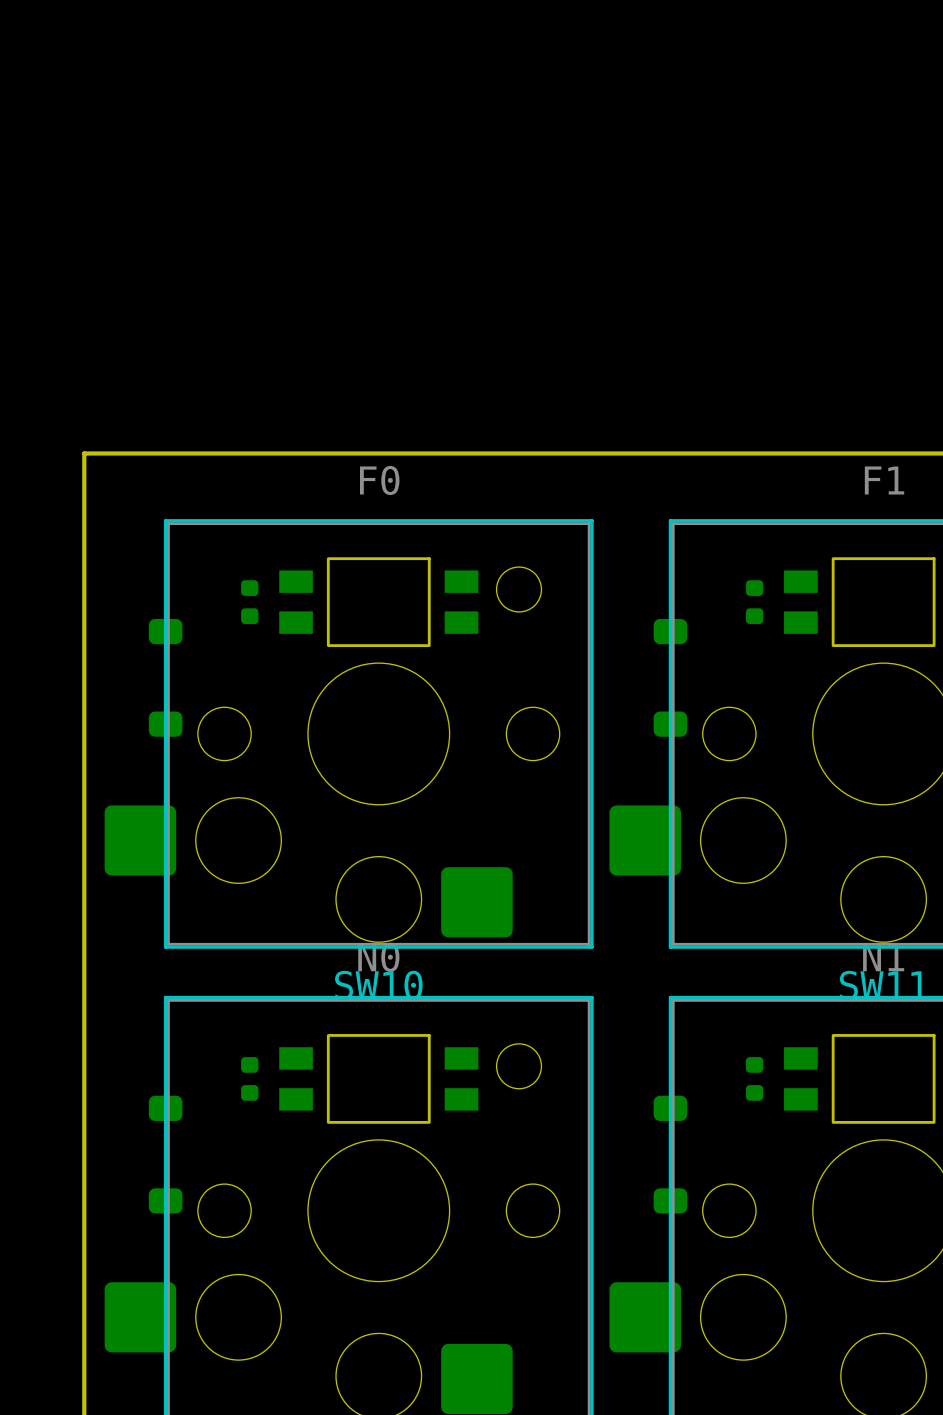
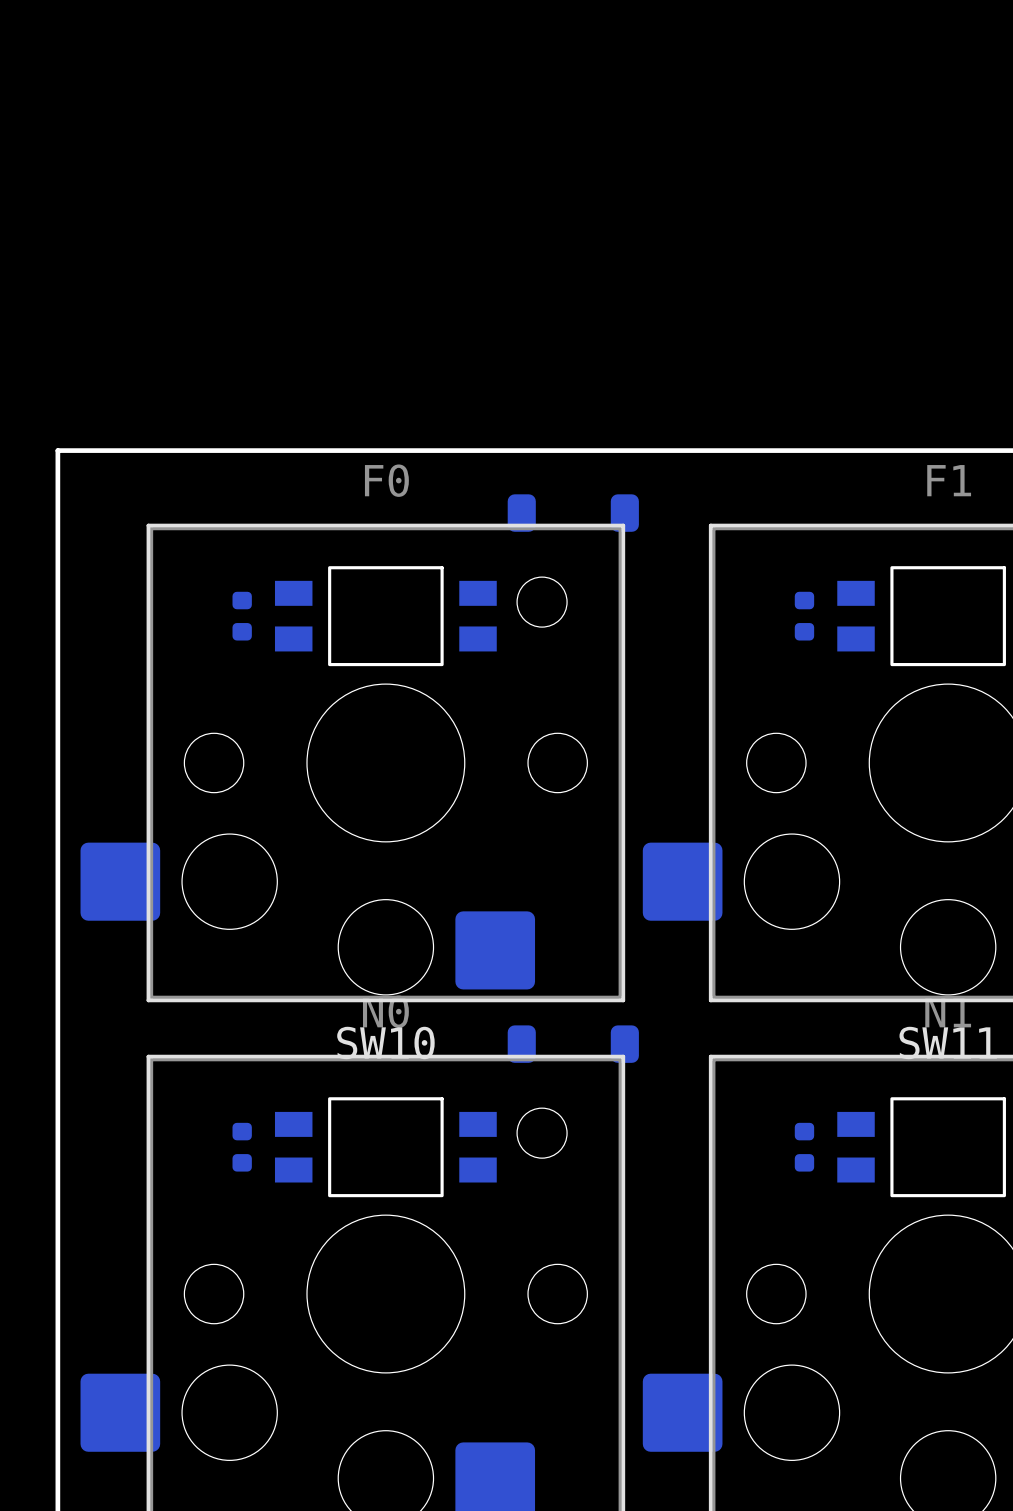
part: none -> (573, 513)
part: (165, 677) -> none
part: (670, 677) -> none
part: none -> (573, 1044)
part: (165, 1154) -> none
part: (670, 1154) -> none

